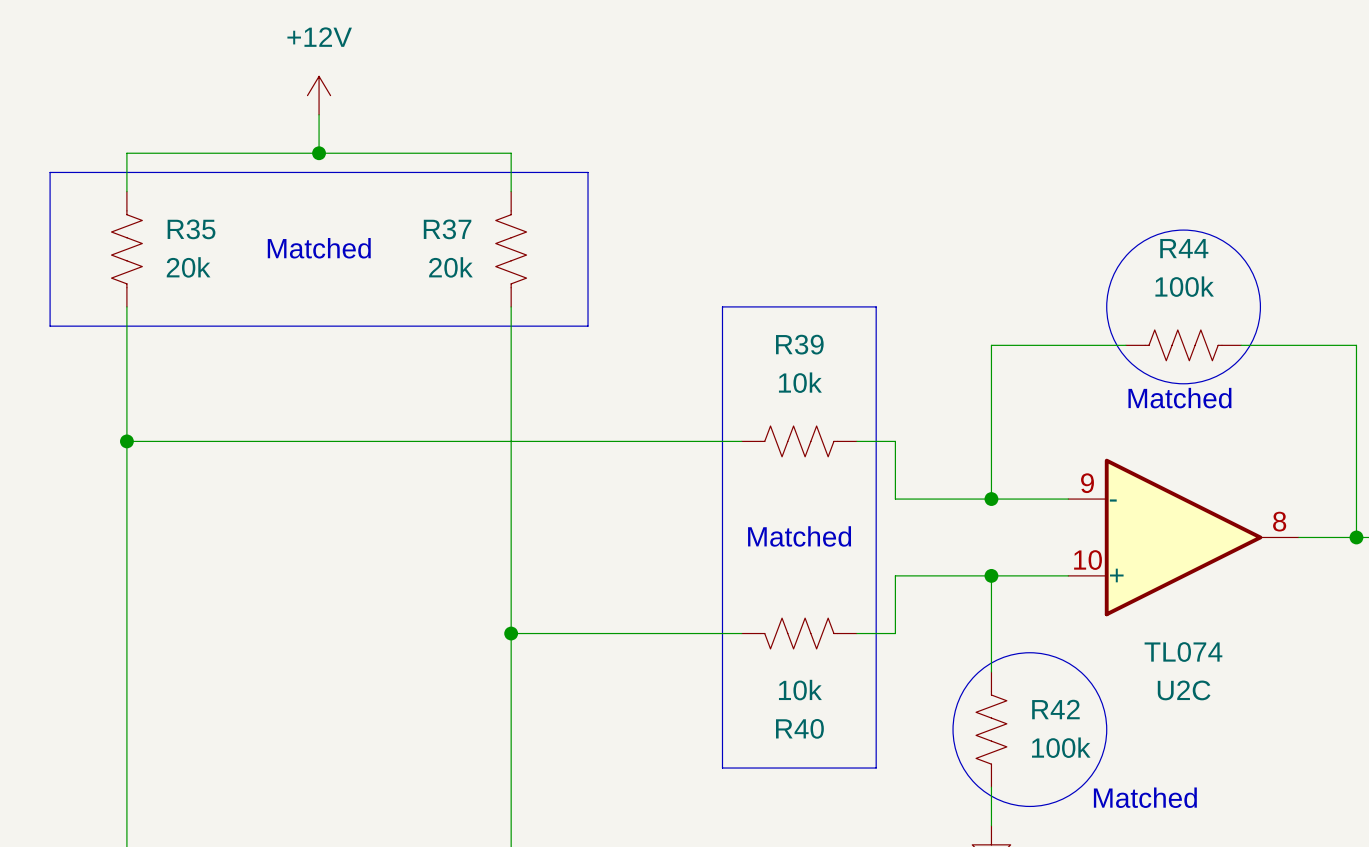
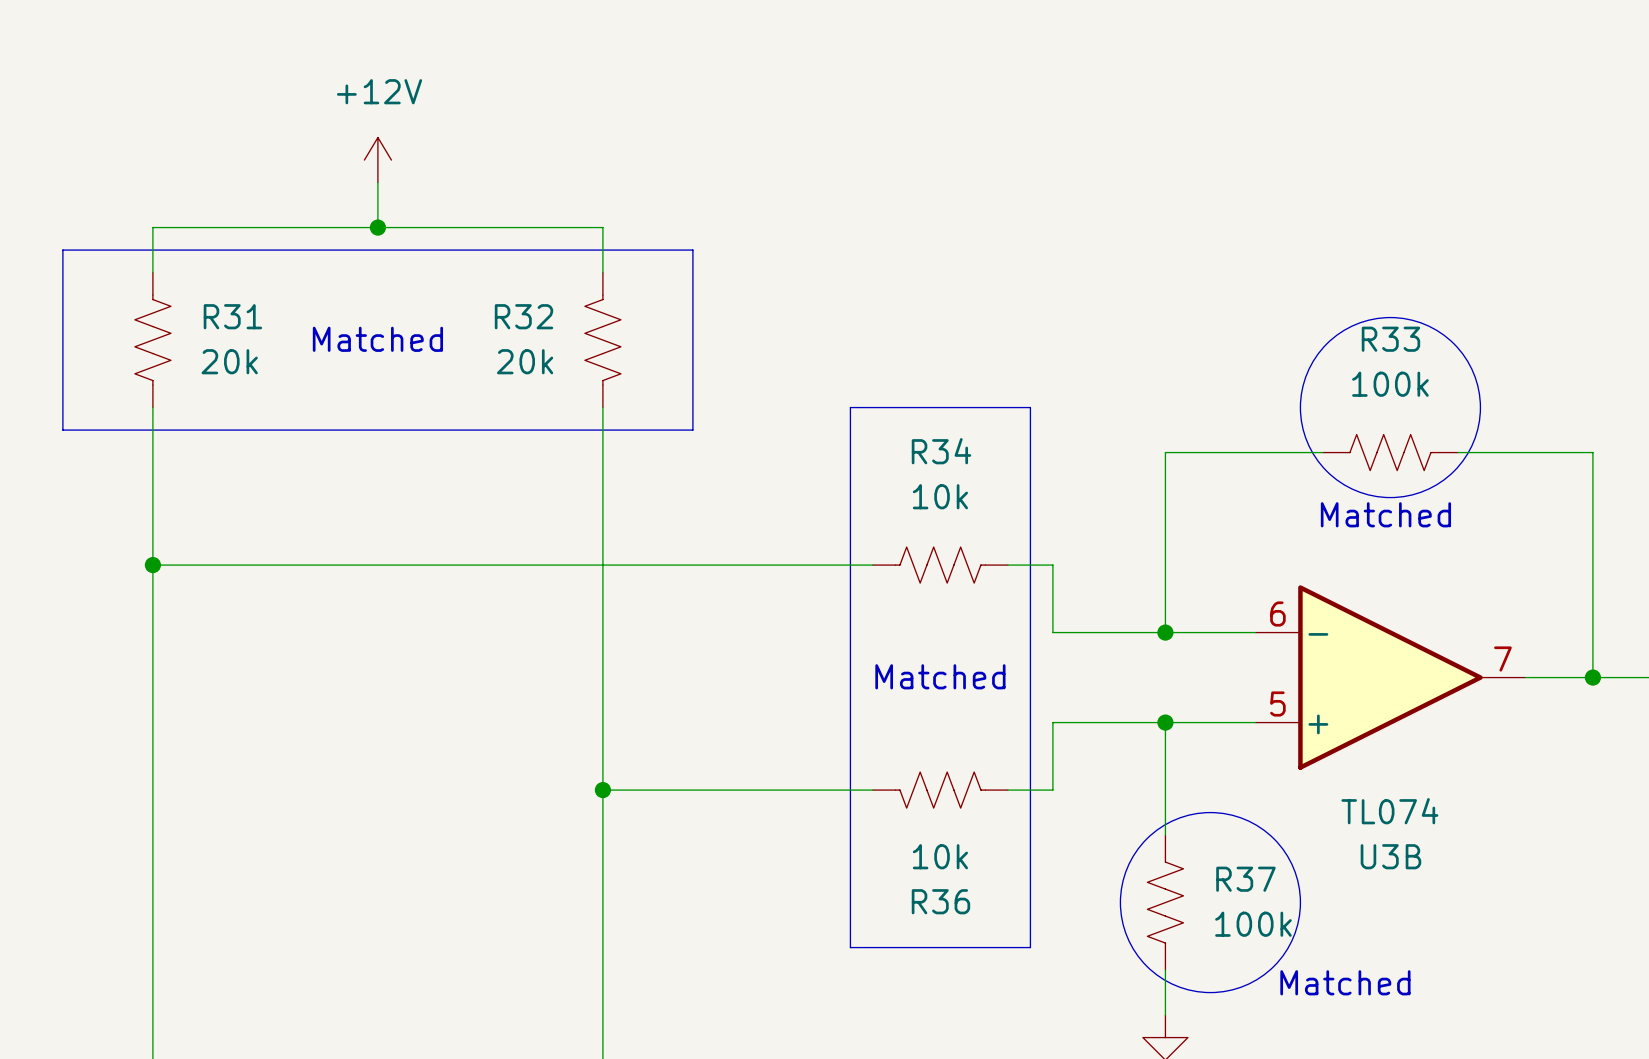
R35 name: R35 (191, 229) -> R31 (232, 316)
R37 name: R37 (447, 229) -> R32 (524, 316)
R44 name: R44 (1184, 248) -> R33 (1390, 339)
R39 name: R39 (799, 344) -> R34 (941, 451)
U2C pin number: 9 (1087, 483) -> 6 (1277, 614)
U2C pin number: 8 (1279, 521) -> 7 (1502, 659)
U2C pin number: 10 (1088, 560) -> 5 (1277, 704)
U2C name: U2C (1184, 690) -> U3B (1390, 856)
R42 name: R42 (1055, 709) -> R37 (1245, 879)
R40 name: R40 (799, 728) -> R36 (940, 901)

